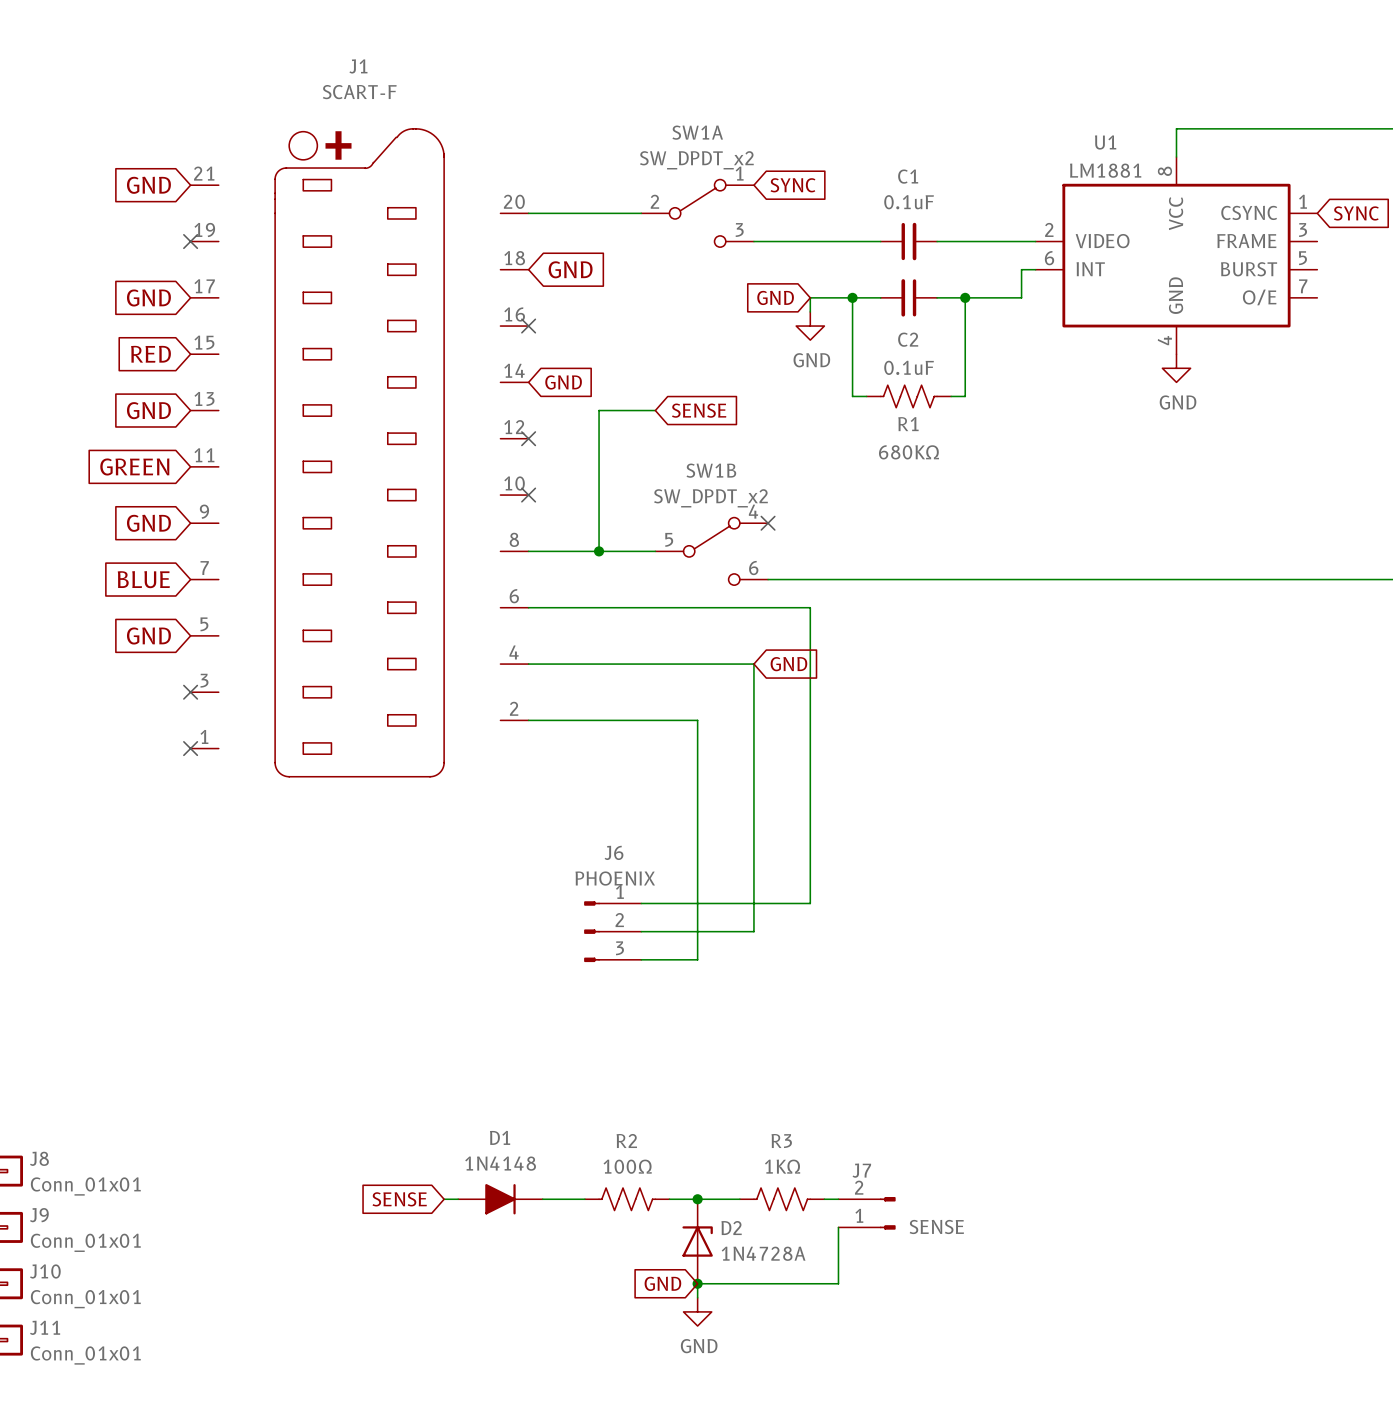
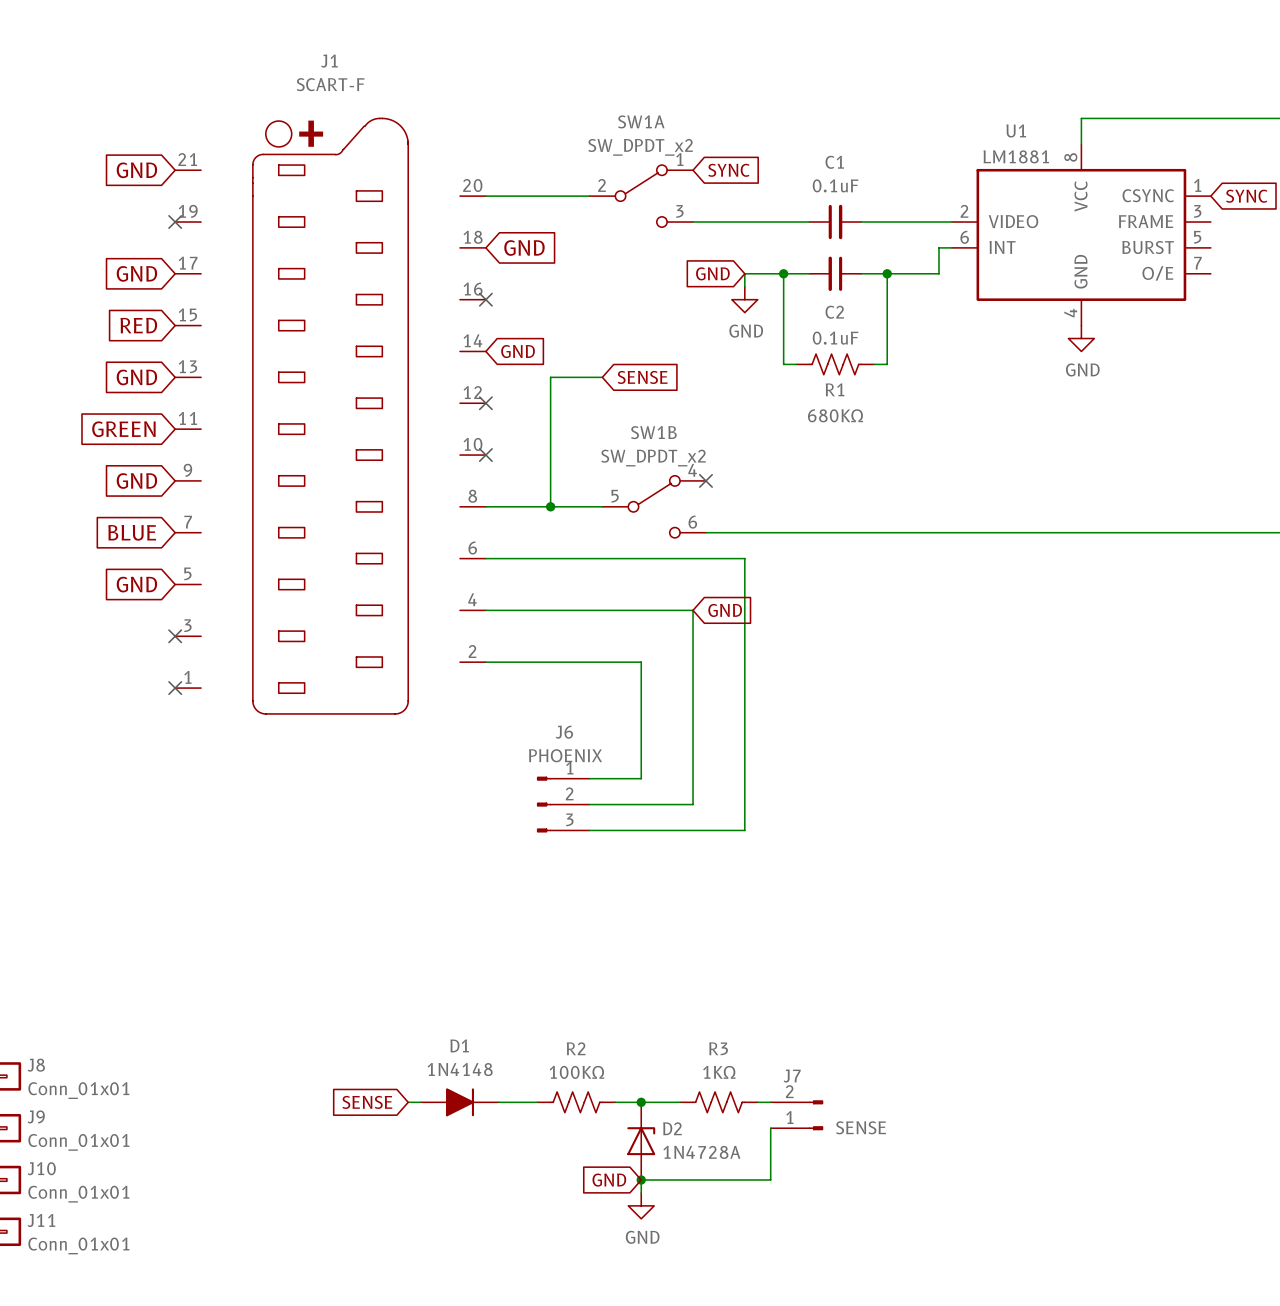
wire: (697, 847) (697, 959) (641, 959) -> (641, 778) (589, 778)
wire: (753, 875) (753, 931) (641, 931) -> (693, 804) (589, 804)
J6 position: (612, 931) -> (563, 804)
R2 value: 100Ω (627, 1166) -> 100KΩ (576, 1072)

